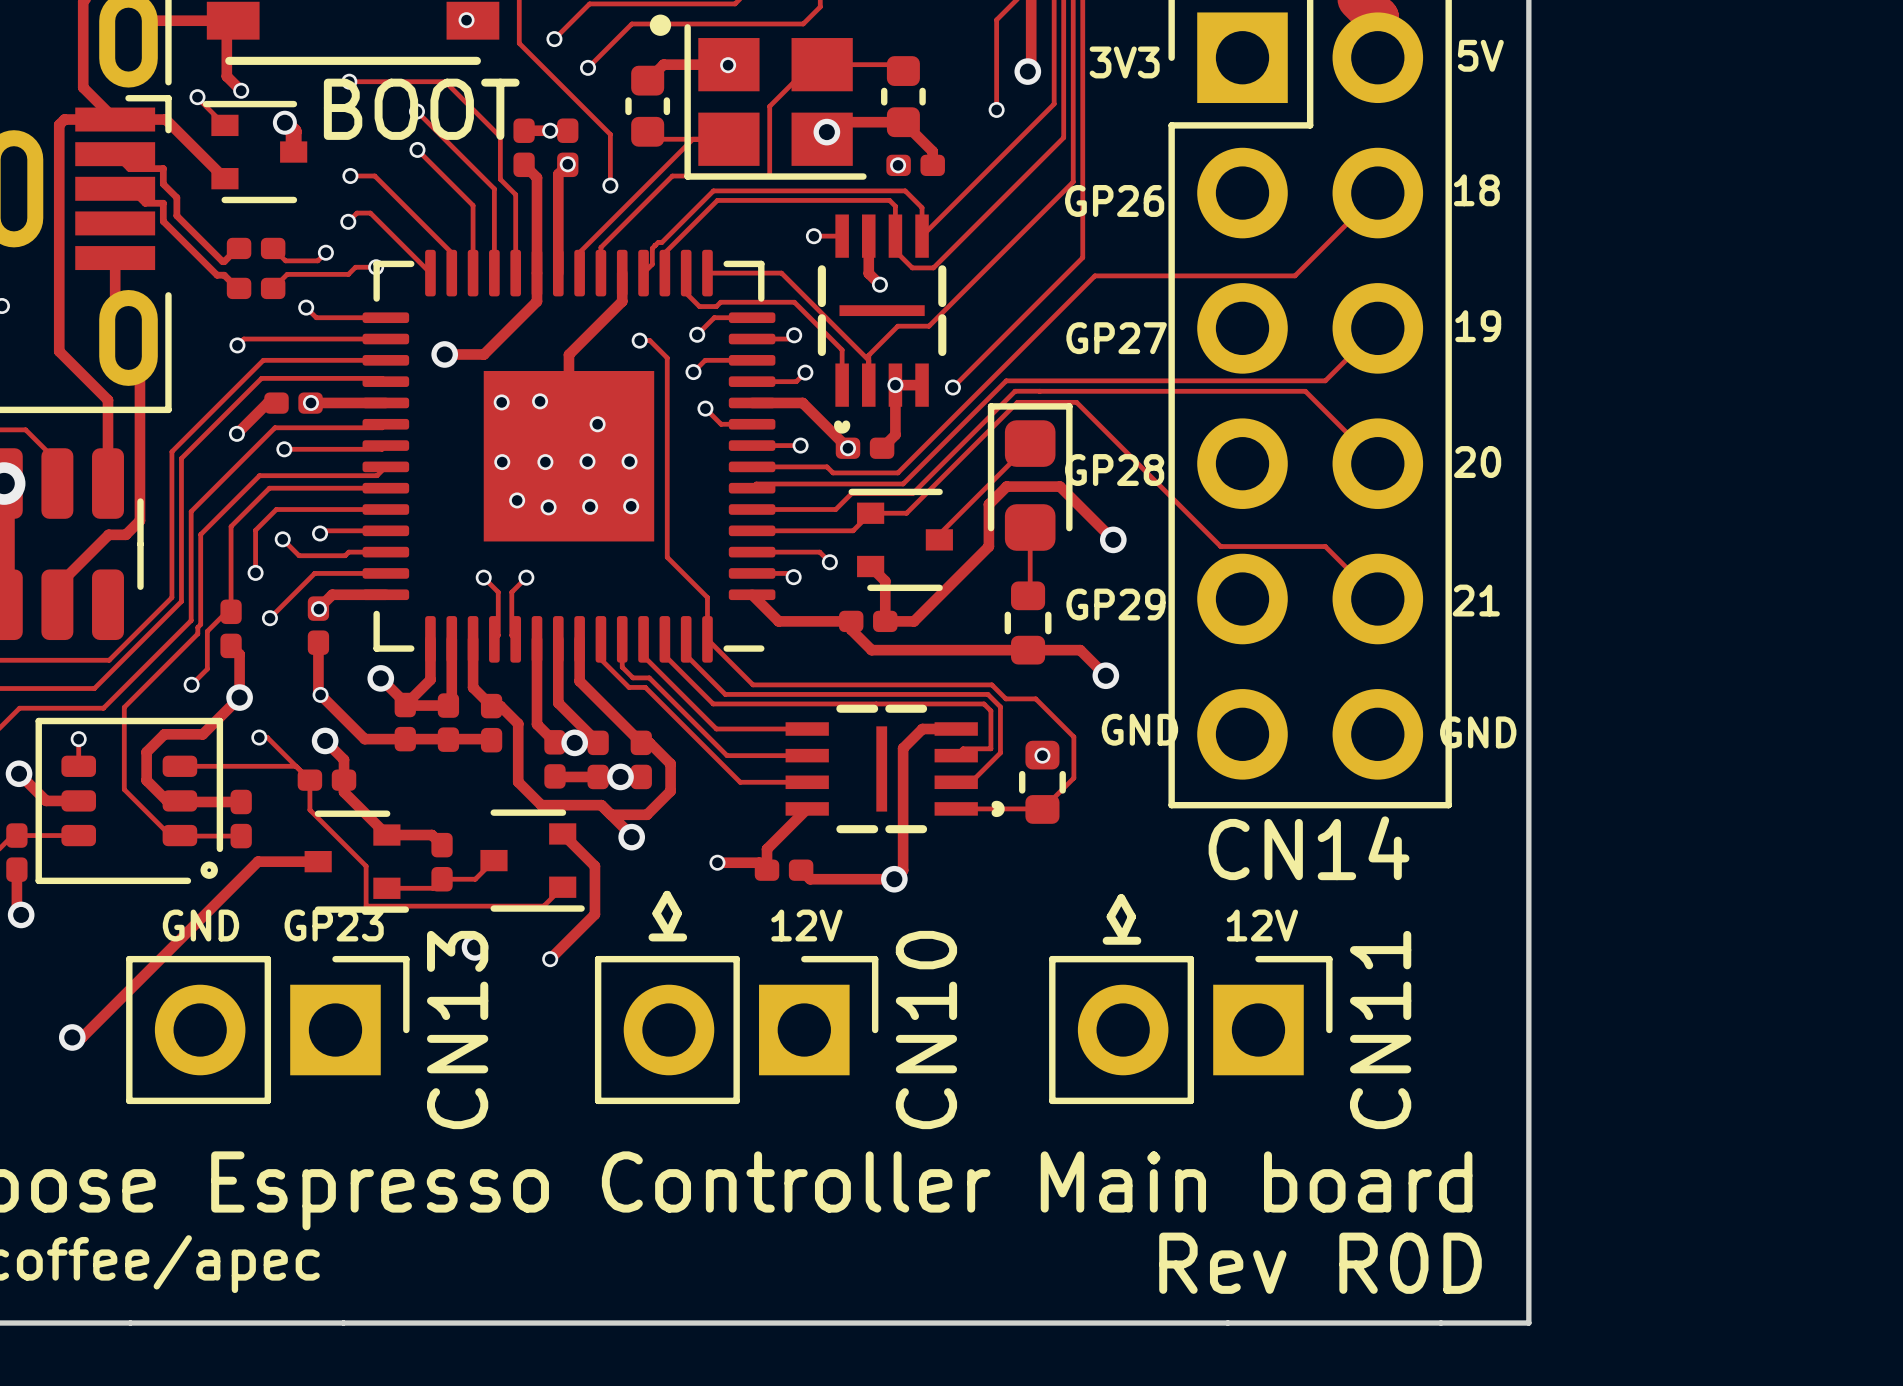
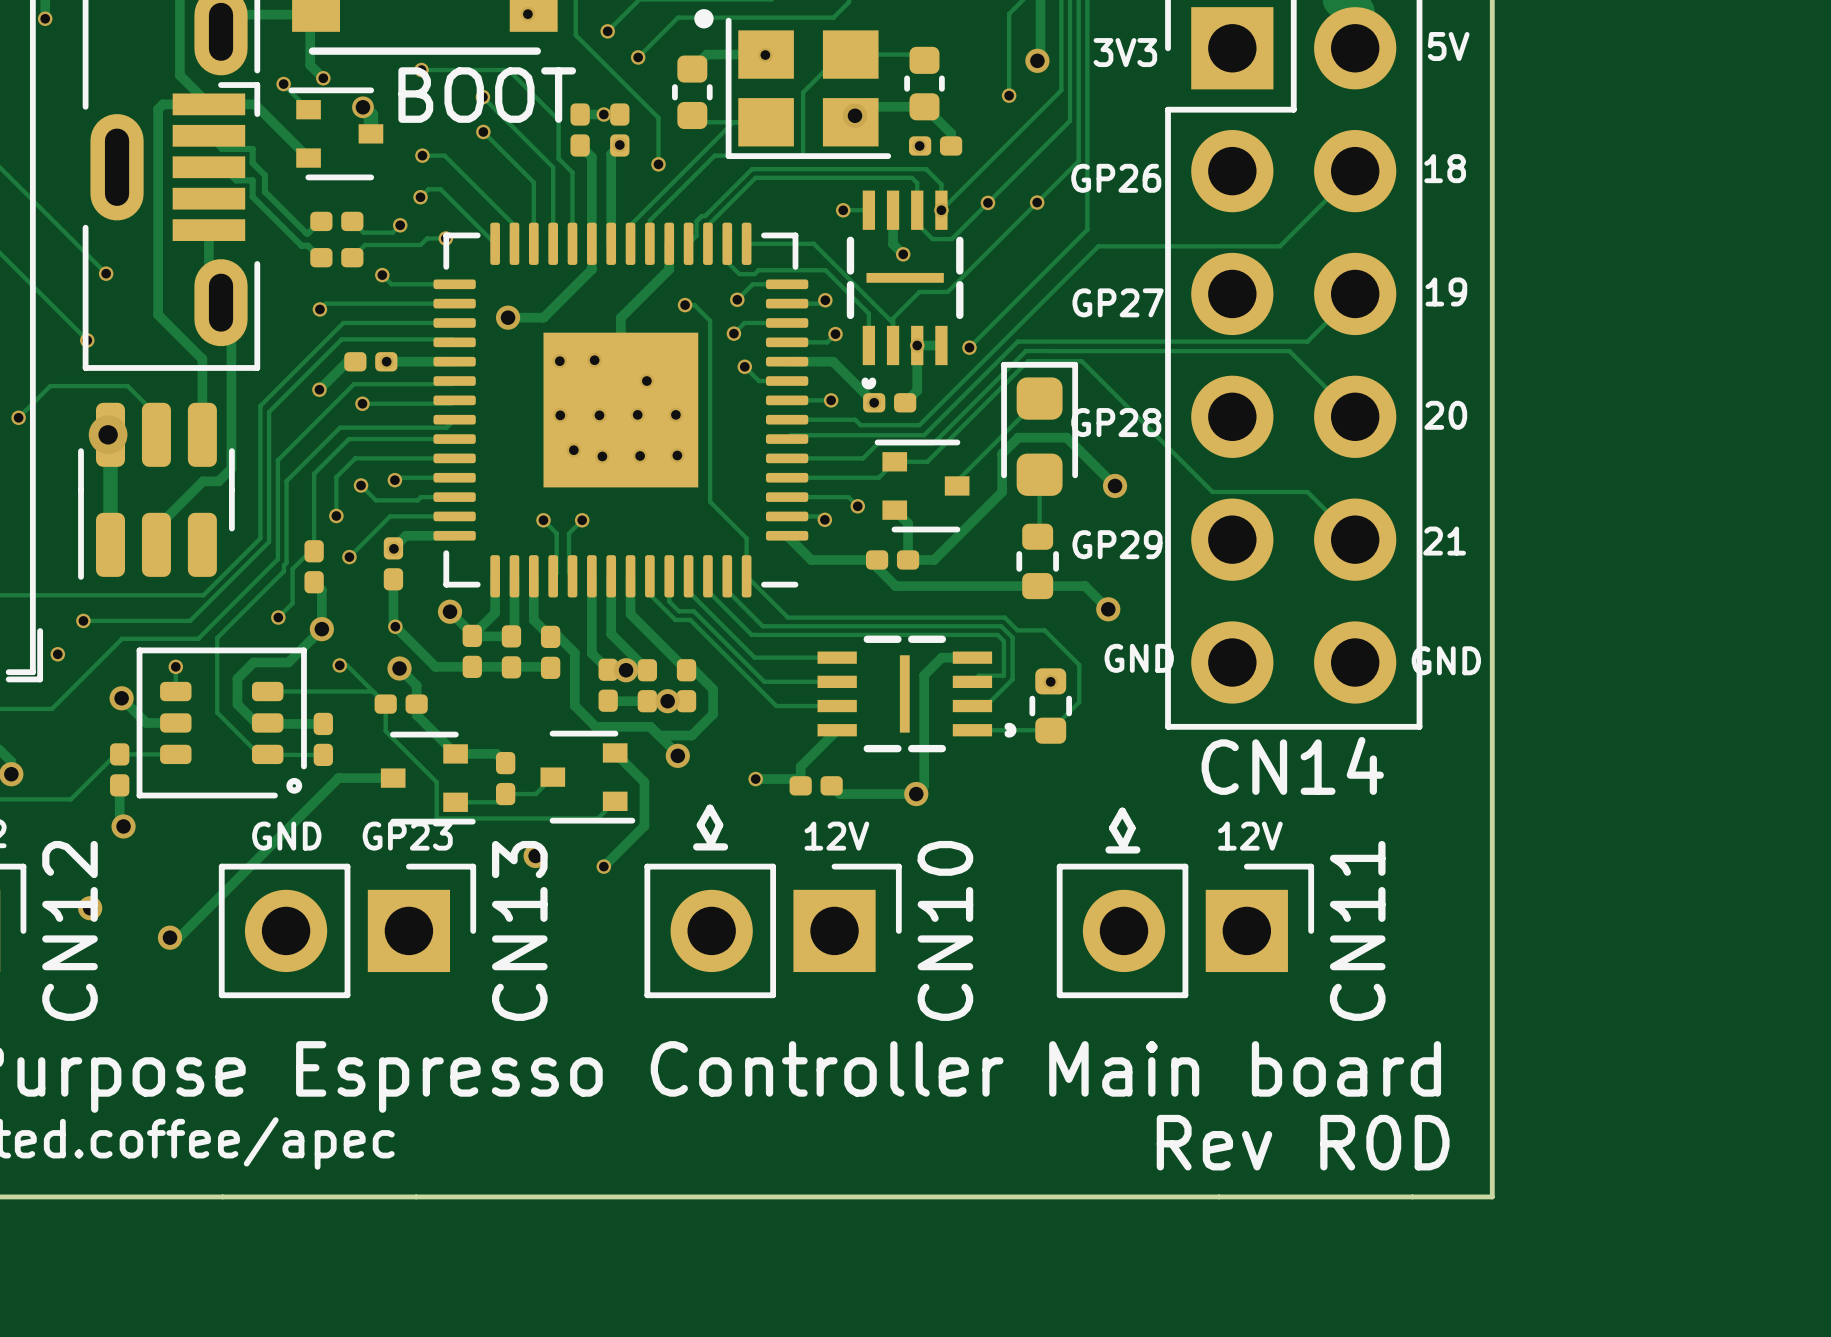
via: none -> (1037, 202)
via: none -> (987, 202)
via: none -> (941, 210)

